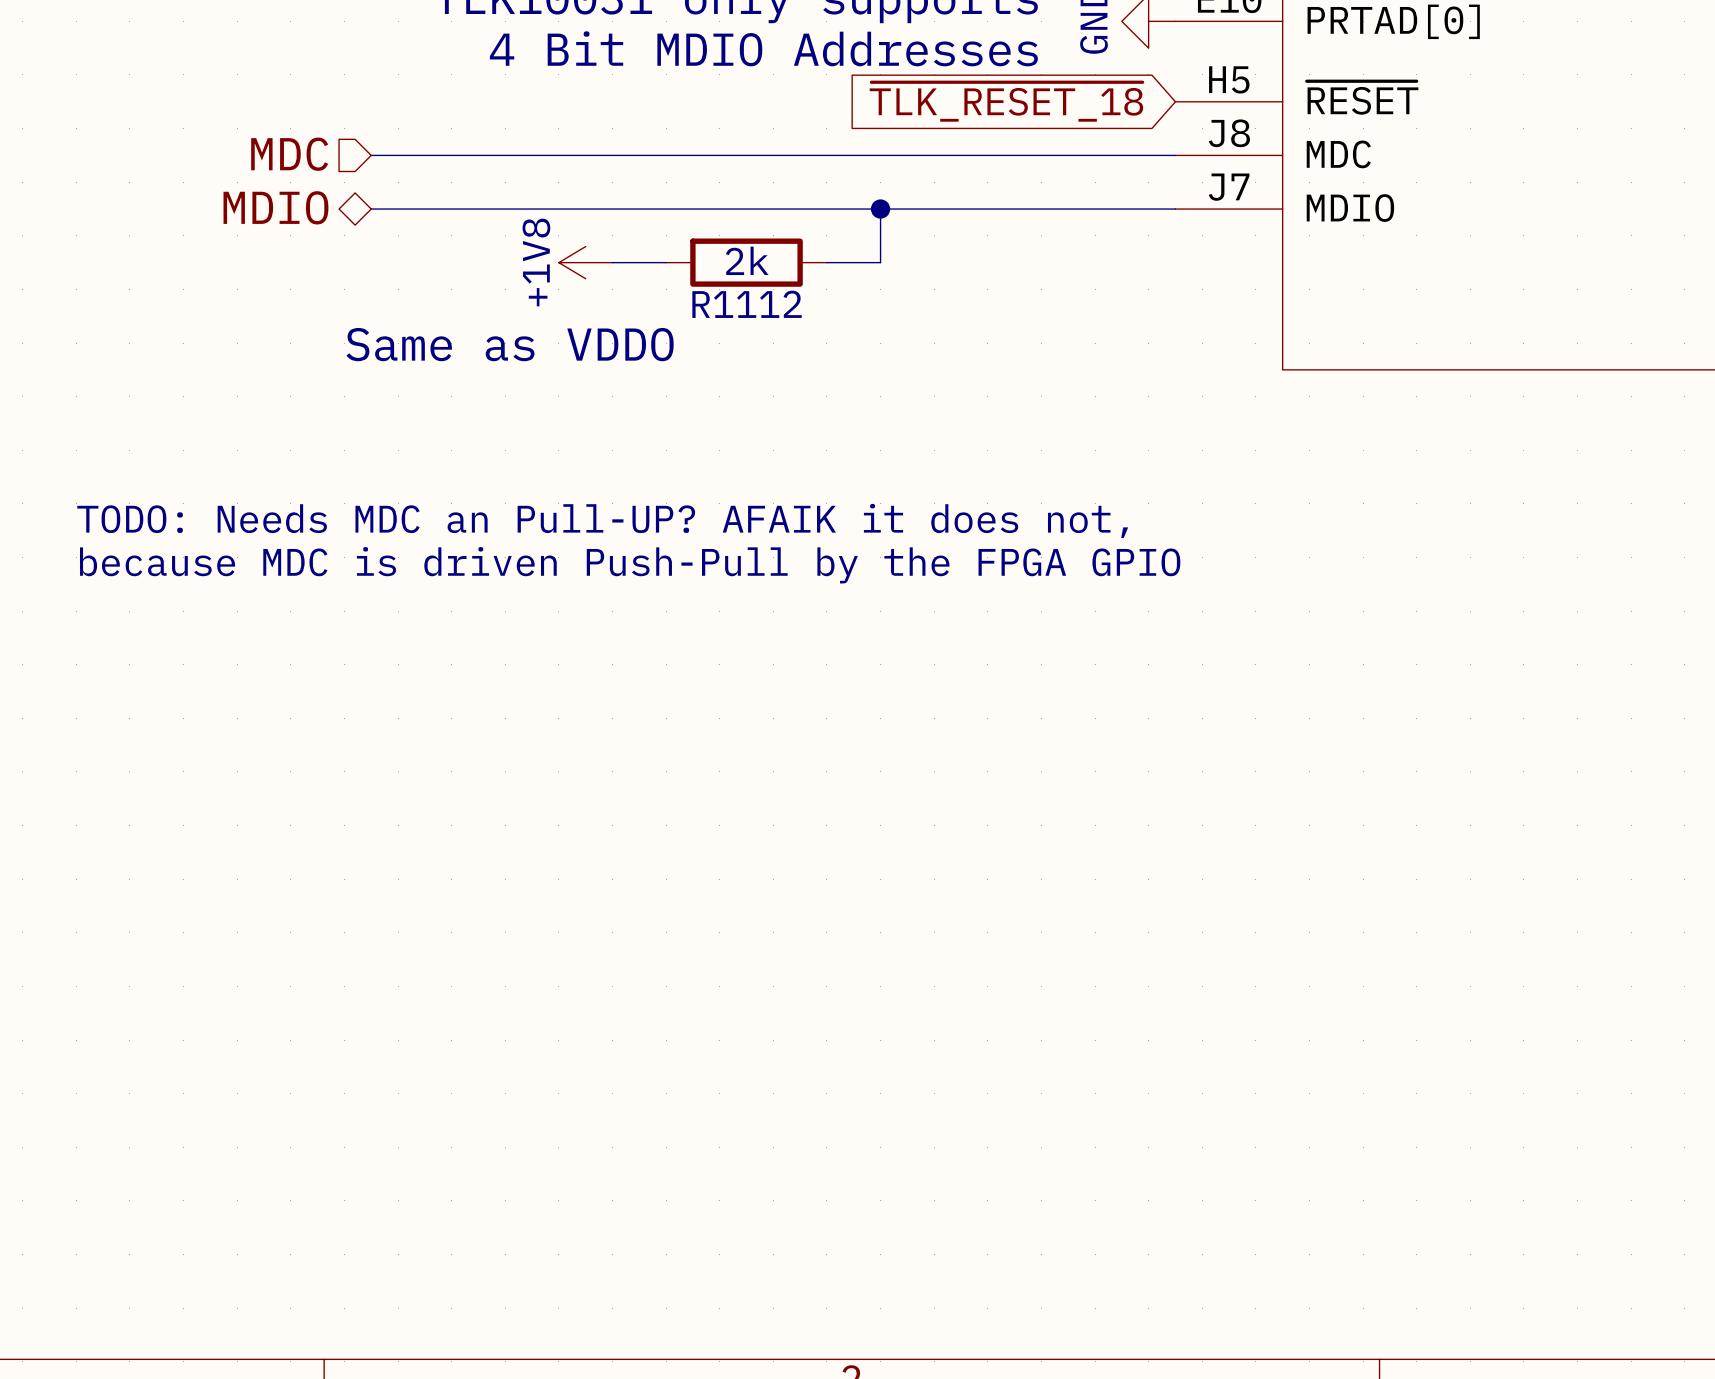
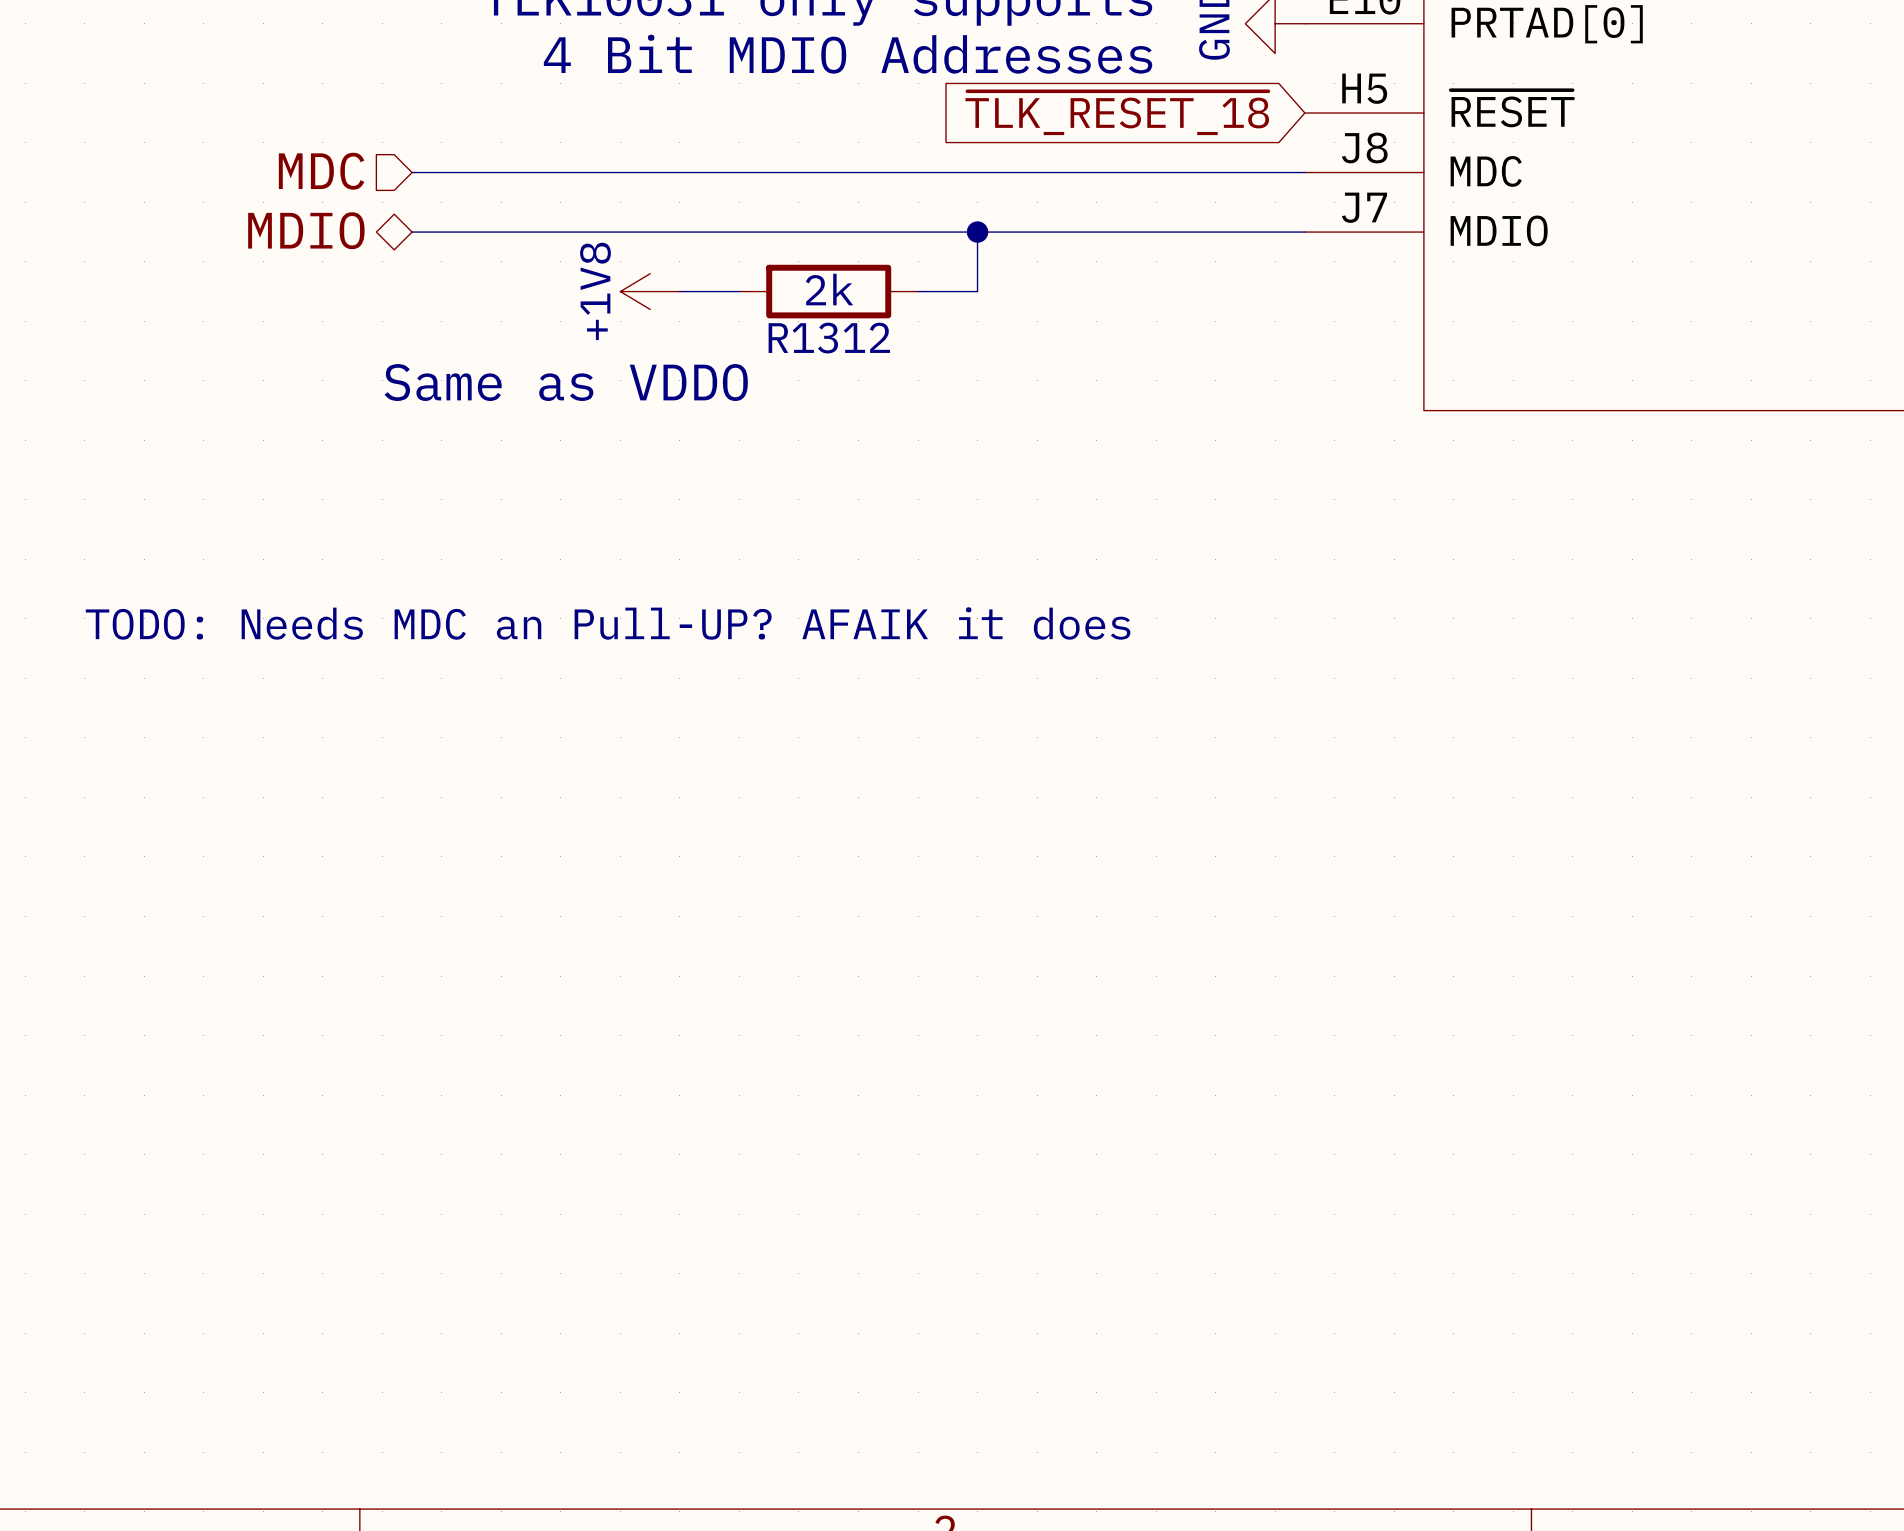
R1112 name: R1112 (747, 304) -> R1312 (829, 338)
text: TODO: Needs MDC an Pull-UP? AFAIK it does not, (602, 520) -> none
text: because MDC is driven Push-Pull by the FPGA GPIO (630, 565) -> TODO: Needs MDC an Pull-UP? AFAIK it does (608, 623)

